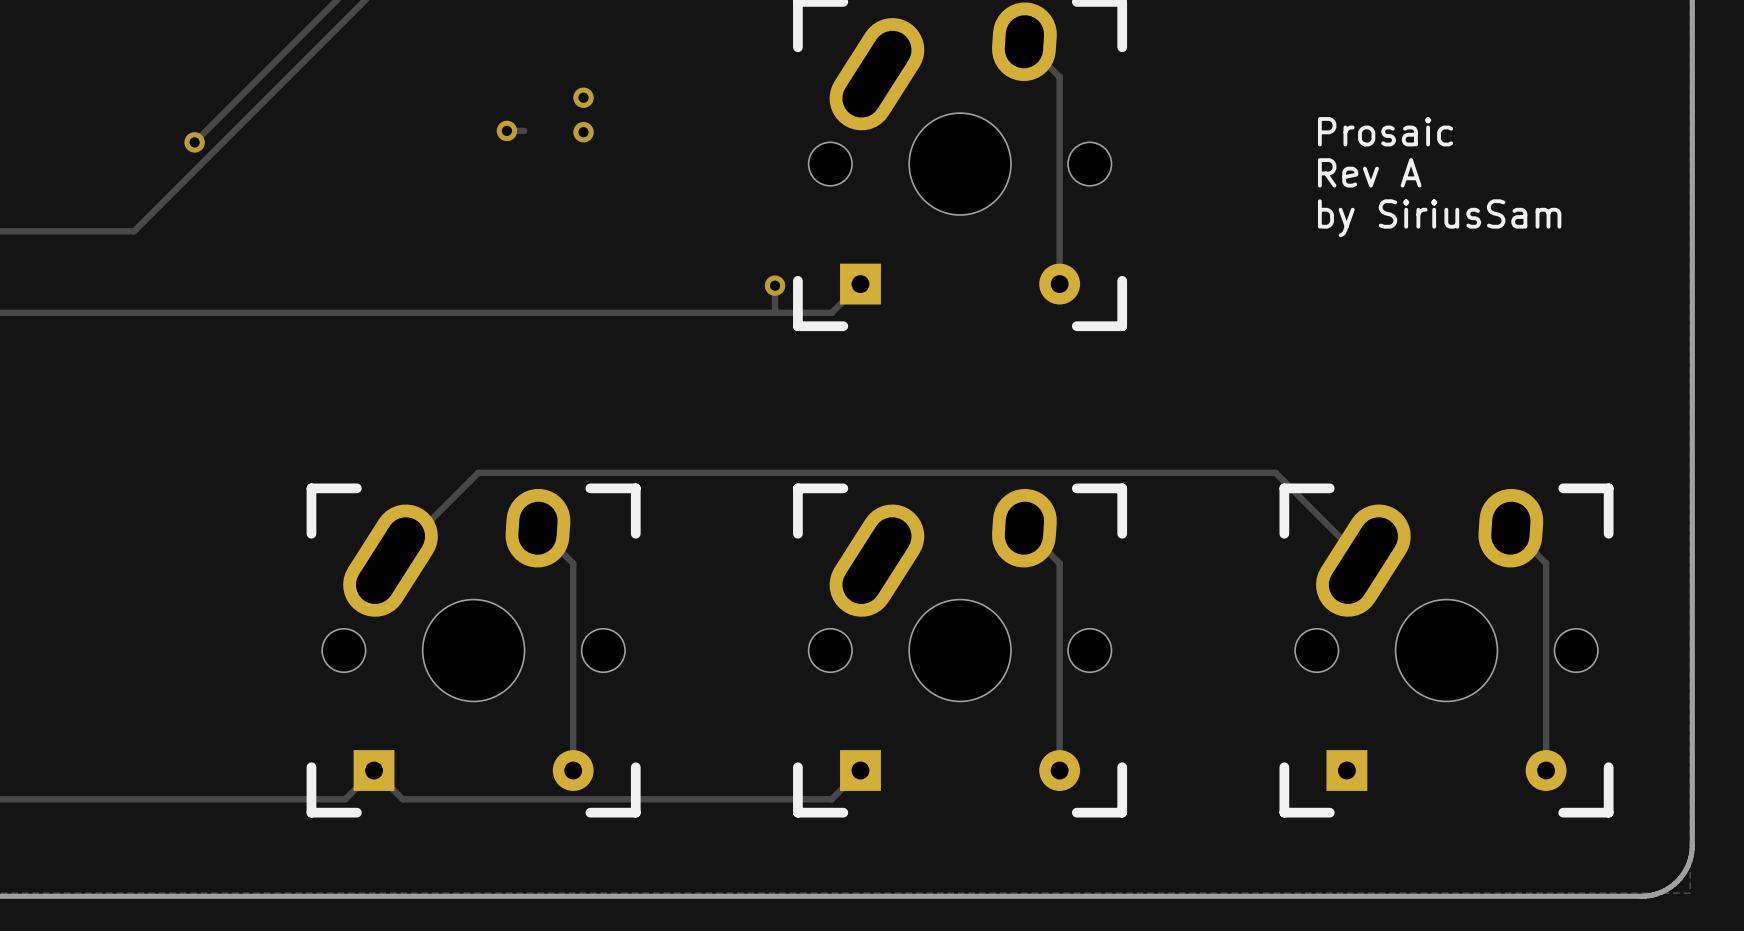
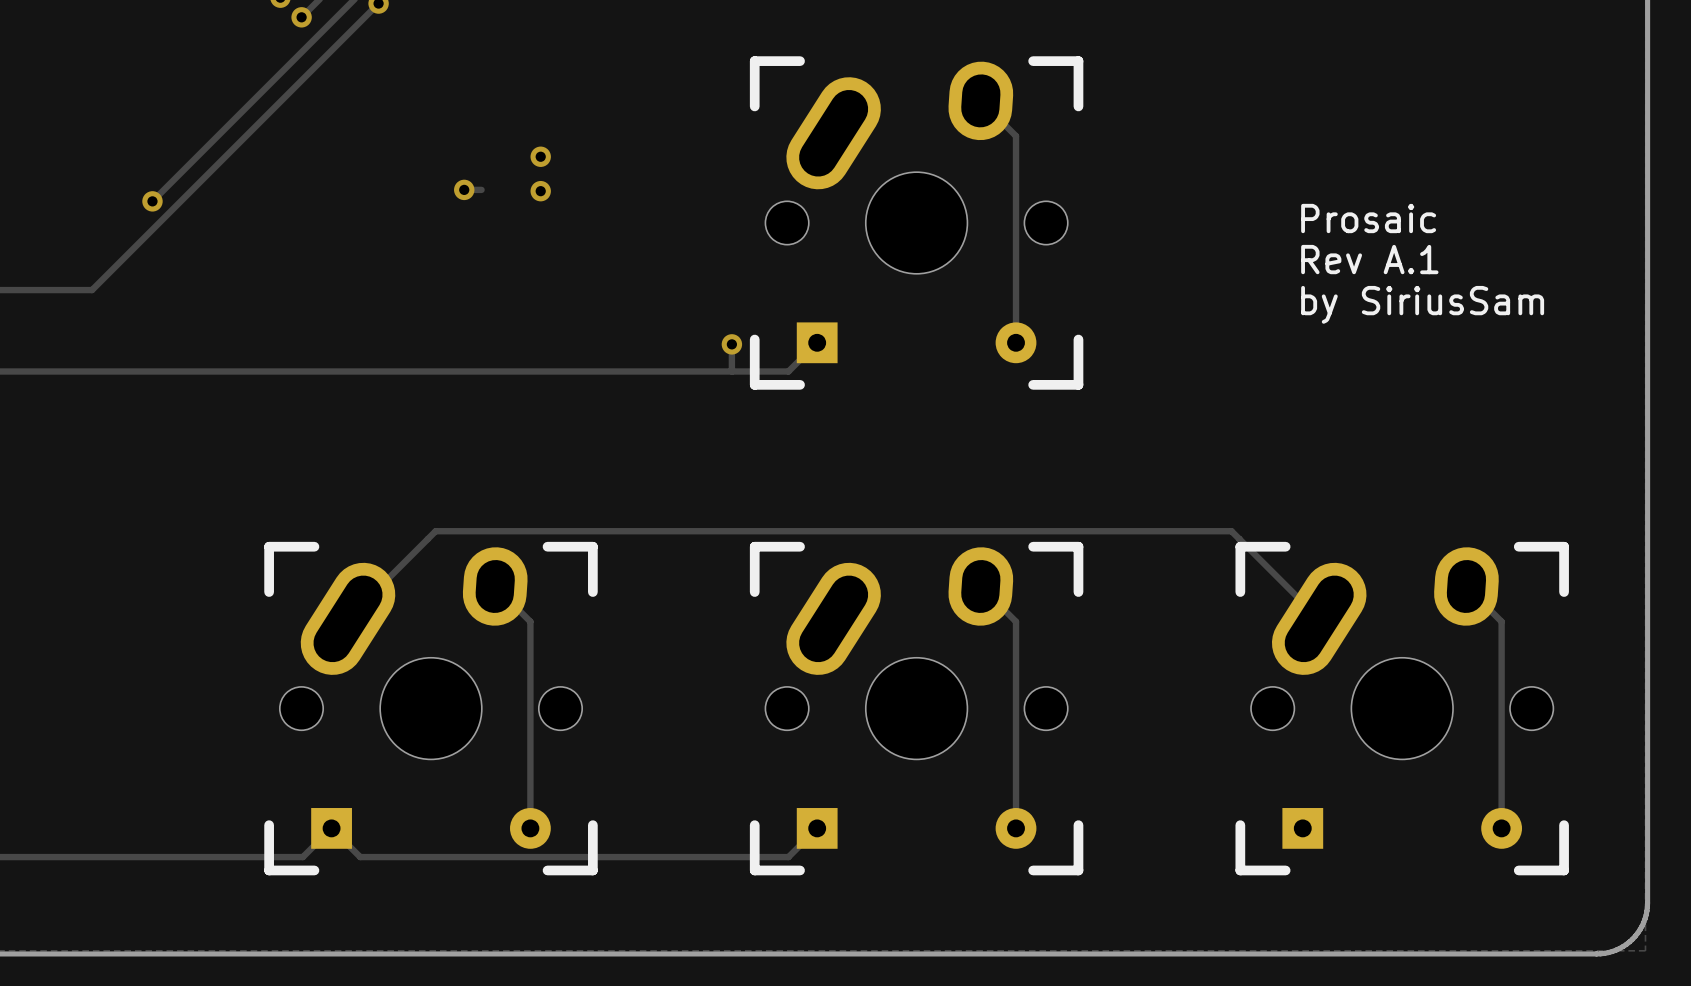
text position: Prosaic (1385, 131) -> Prosaic (1368, 218)
text: Rev A (1369, 172) -> Rev A.1 (1369, 259)
text position: by SiriusSam (1439, 218) -> by SiriusSam (1422, 304)

